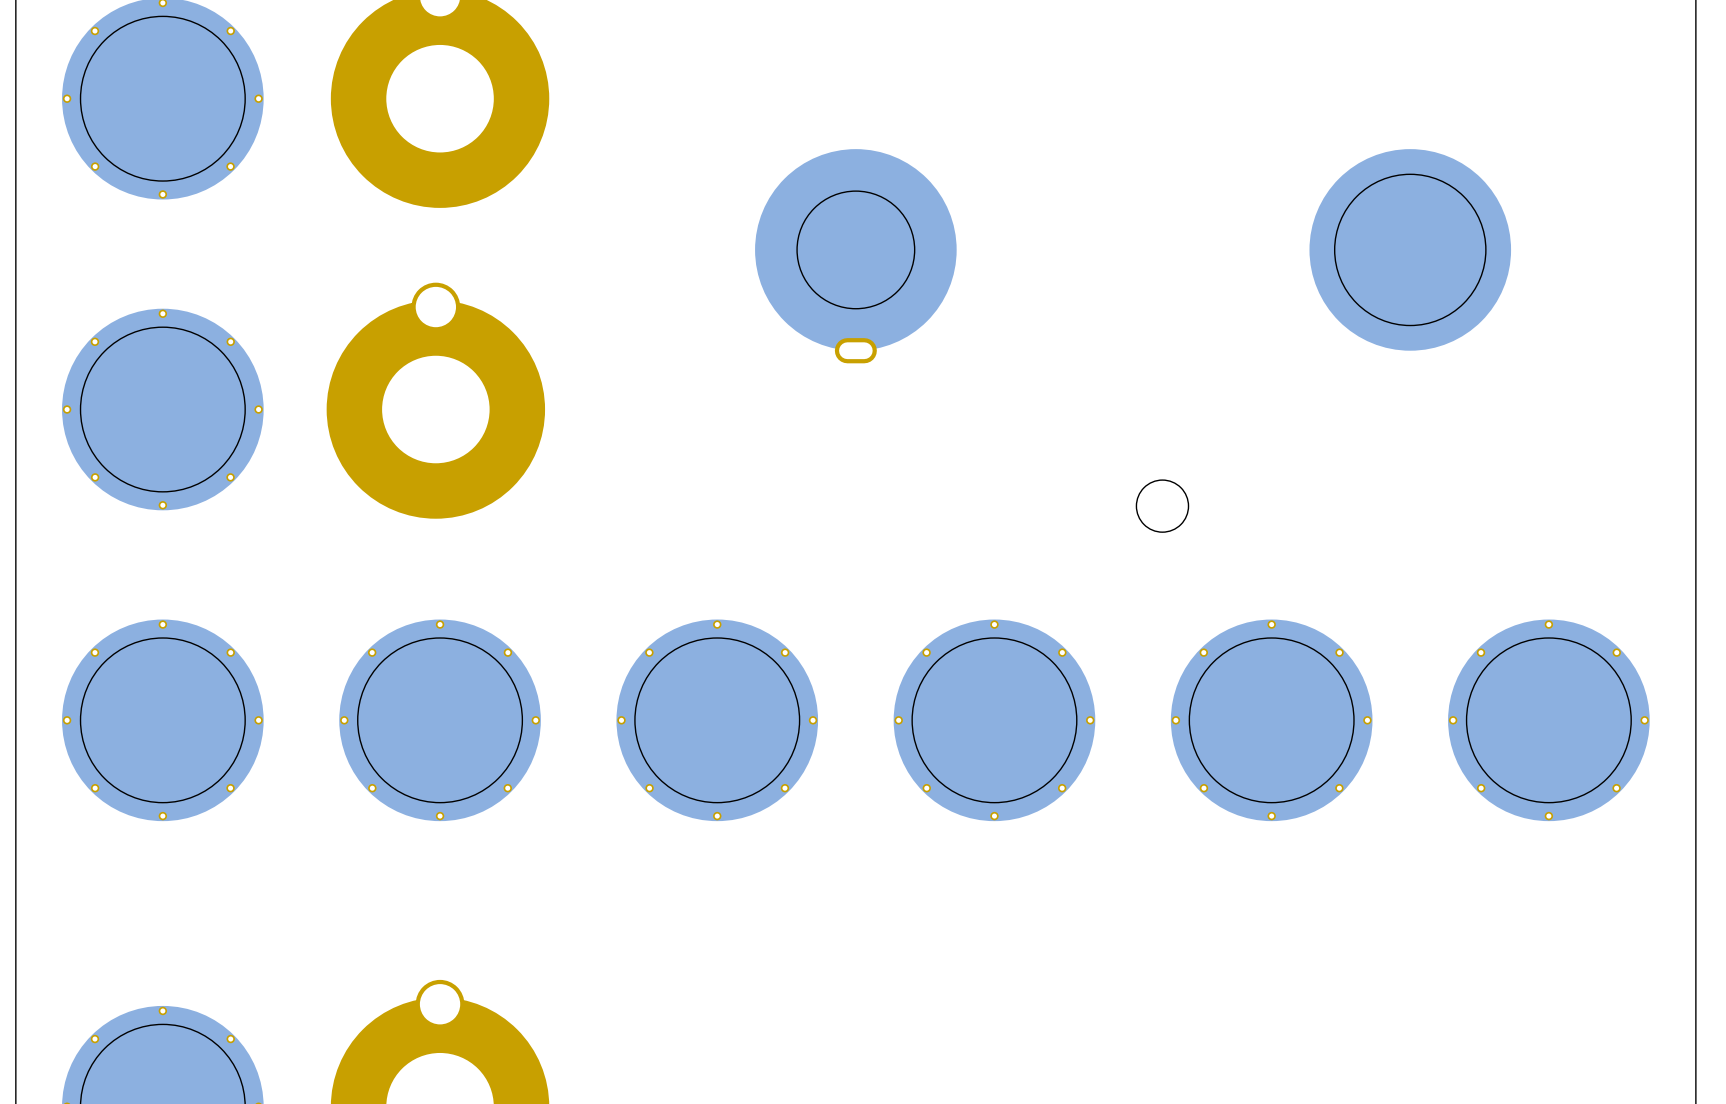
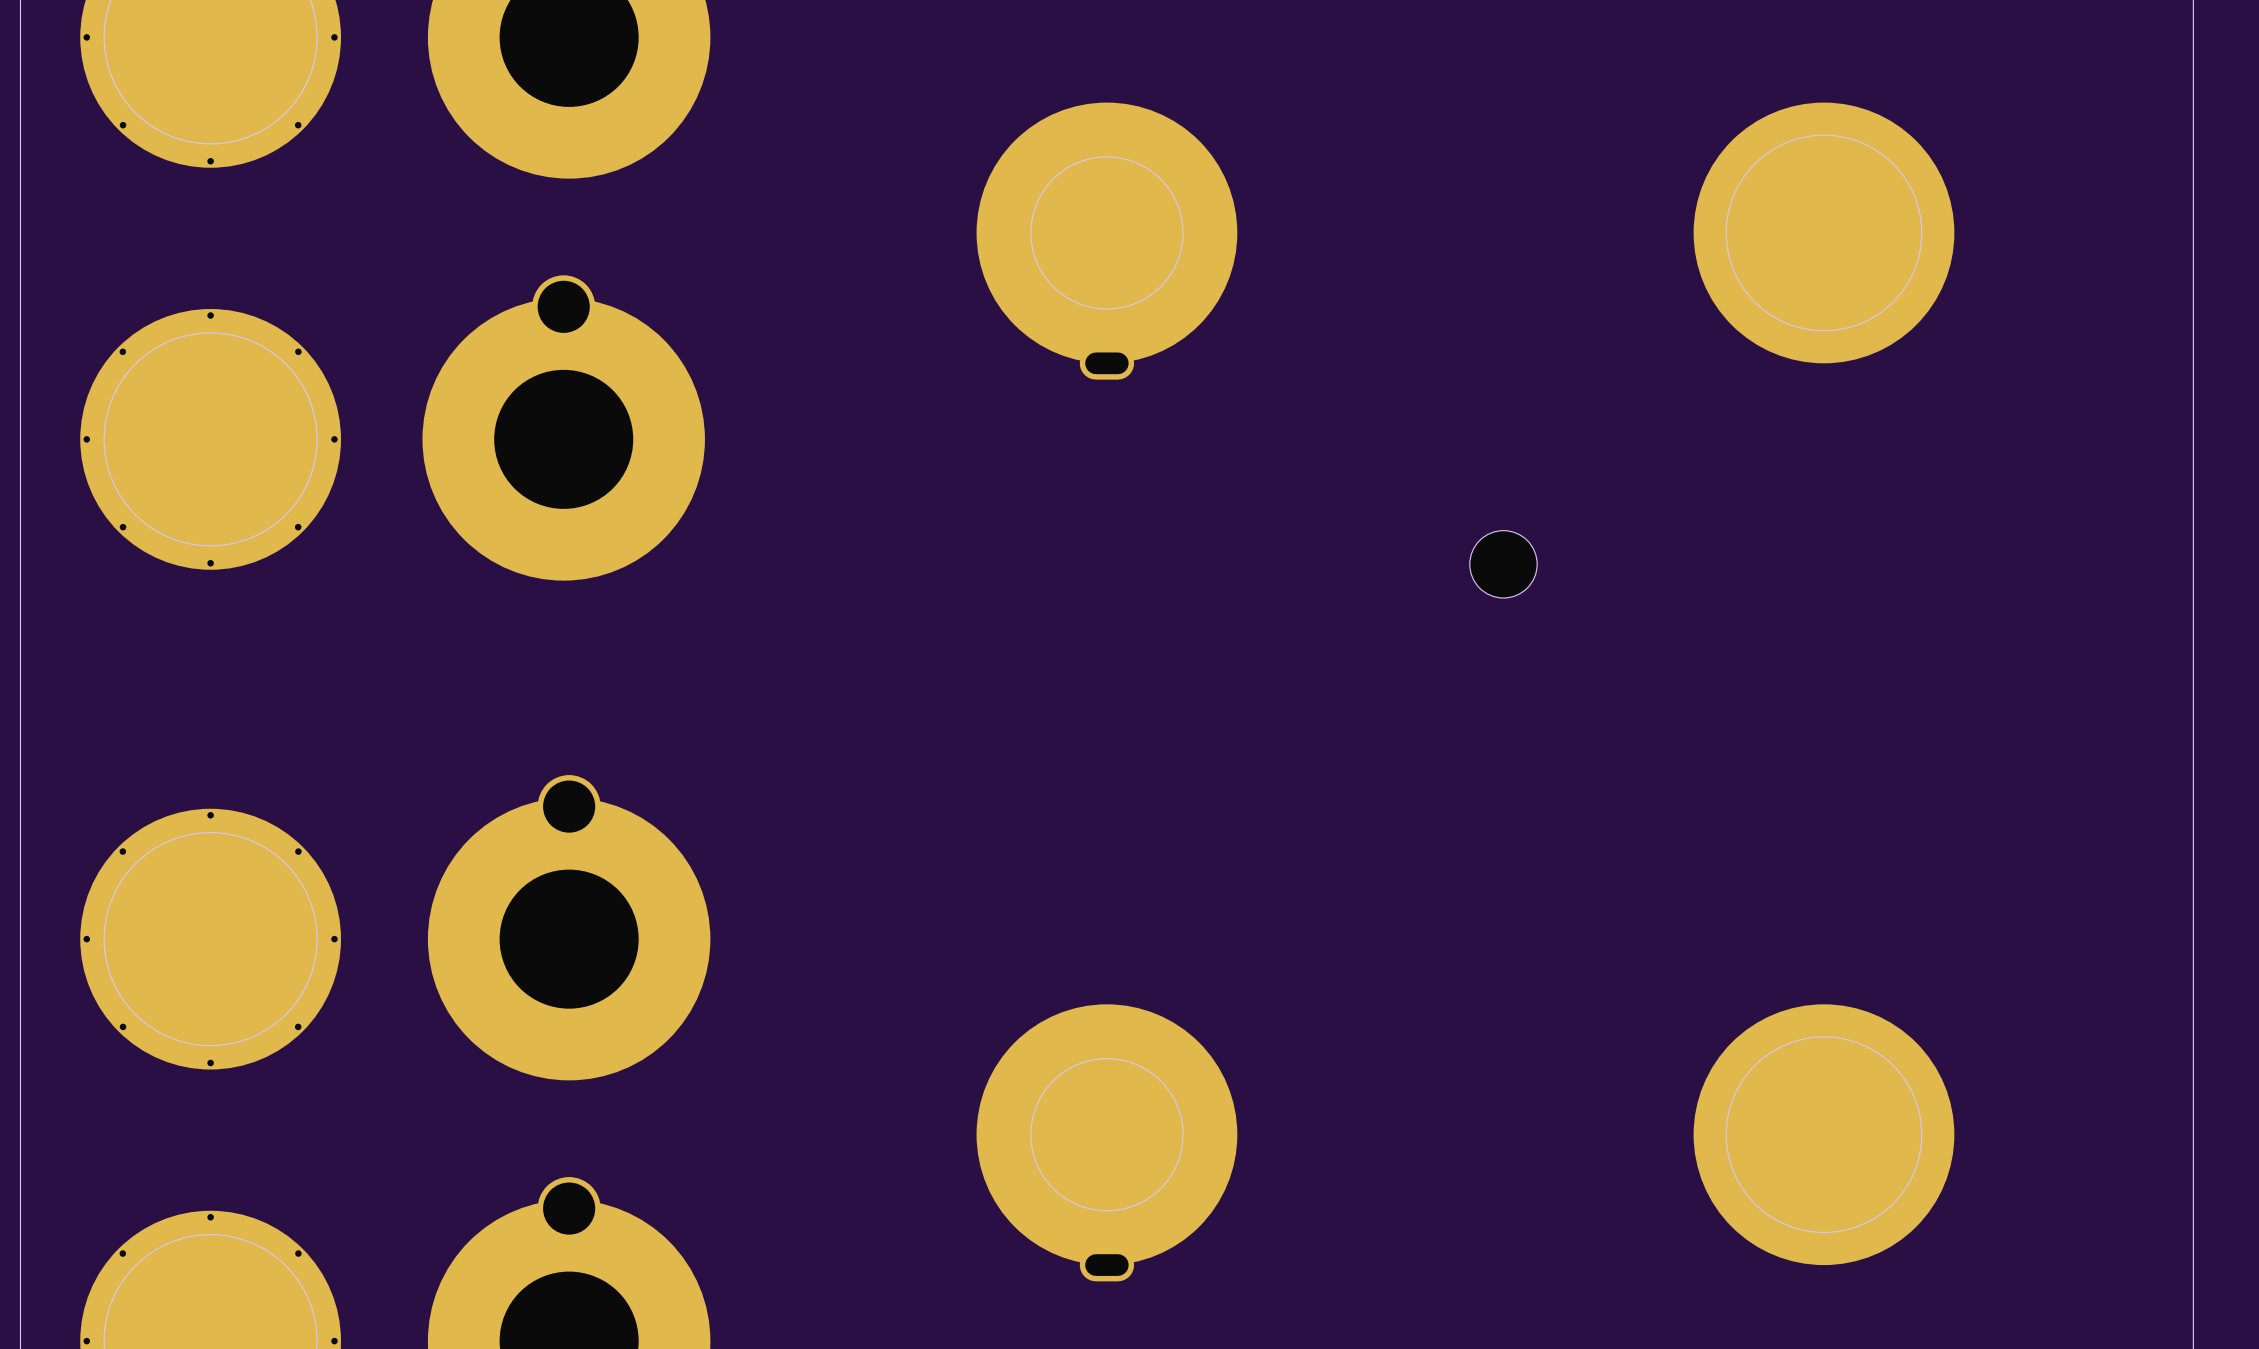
part position: (162, 720) -> (210, 939)
part: (440, 720) -> none
part: (717, 720) -> none
part: (994, 720) -> none
part: (1271, 720) -> none
part: (1548, 720) -> none
part: none -> (569, 927)
part: none -> (1823, 1134)
part: none -> (1106, 1142)

